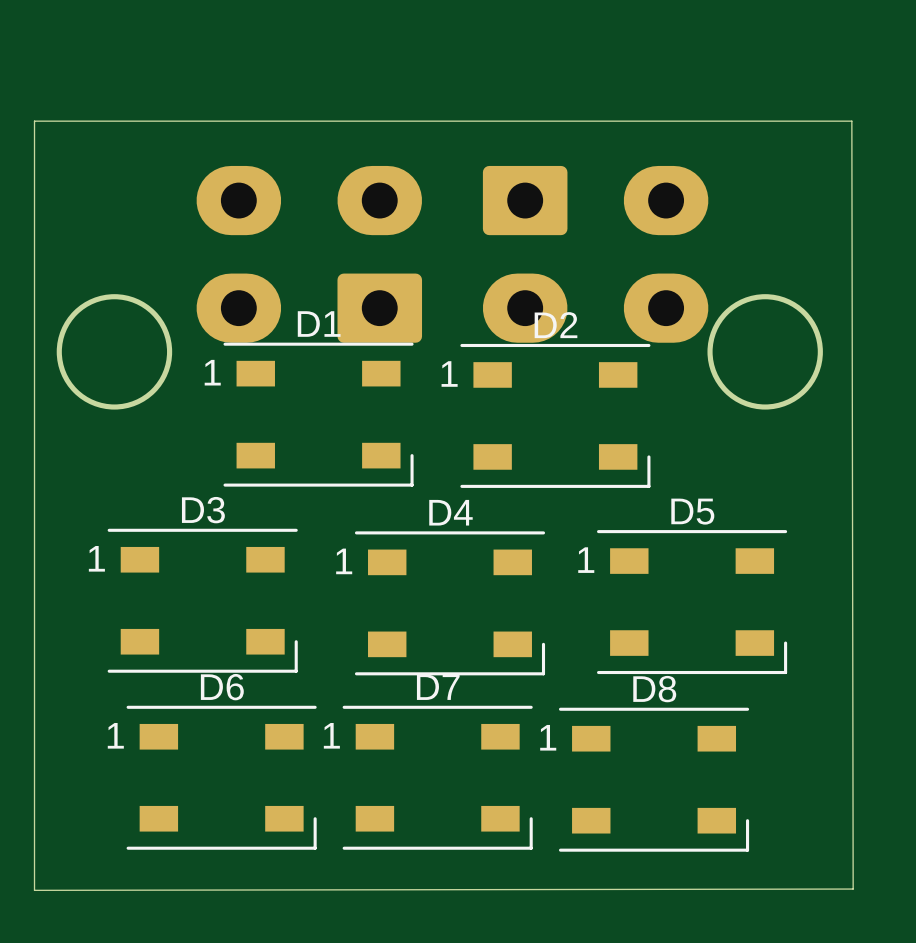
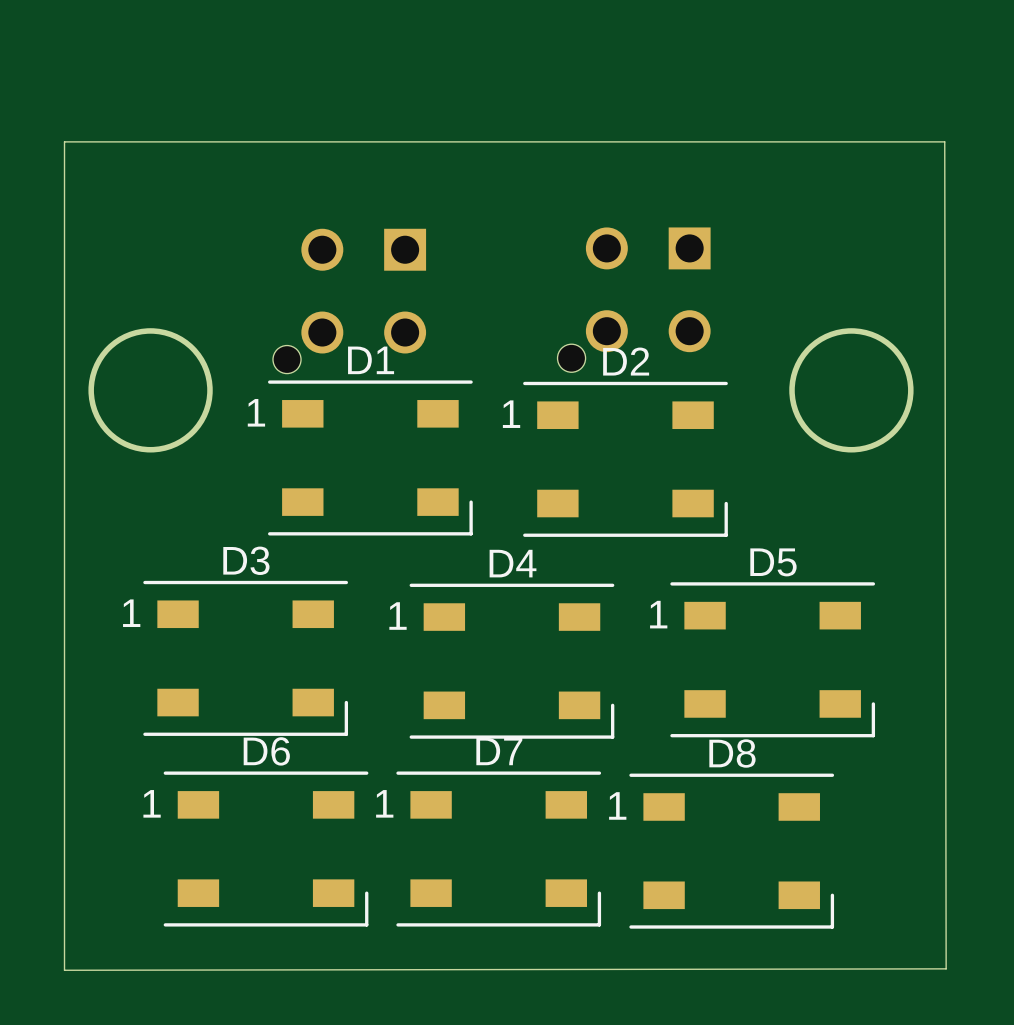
part footprint: [196, 165, 423, 343] -> [273, 228, 427, 374]
part: (595, 254) -> none
part: none -> (634, 299)

